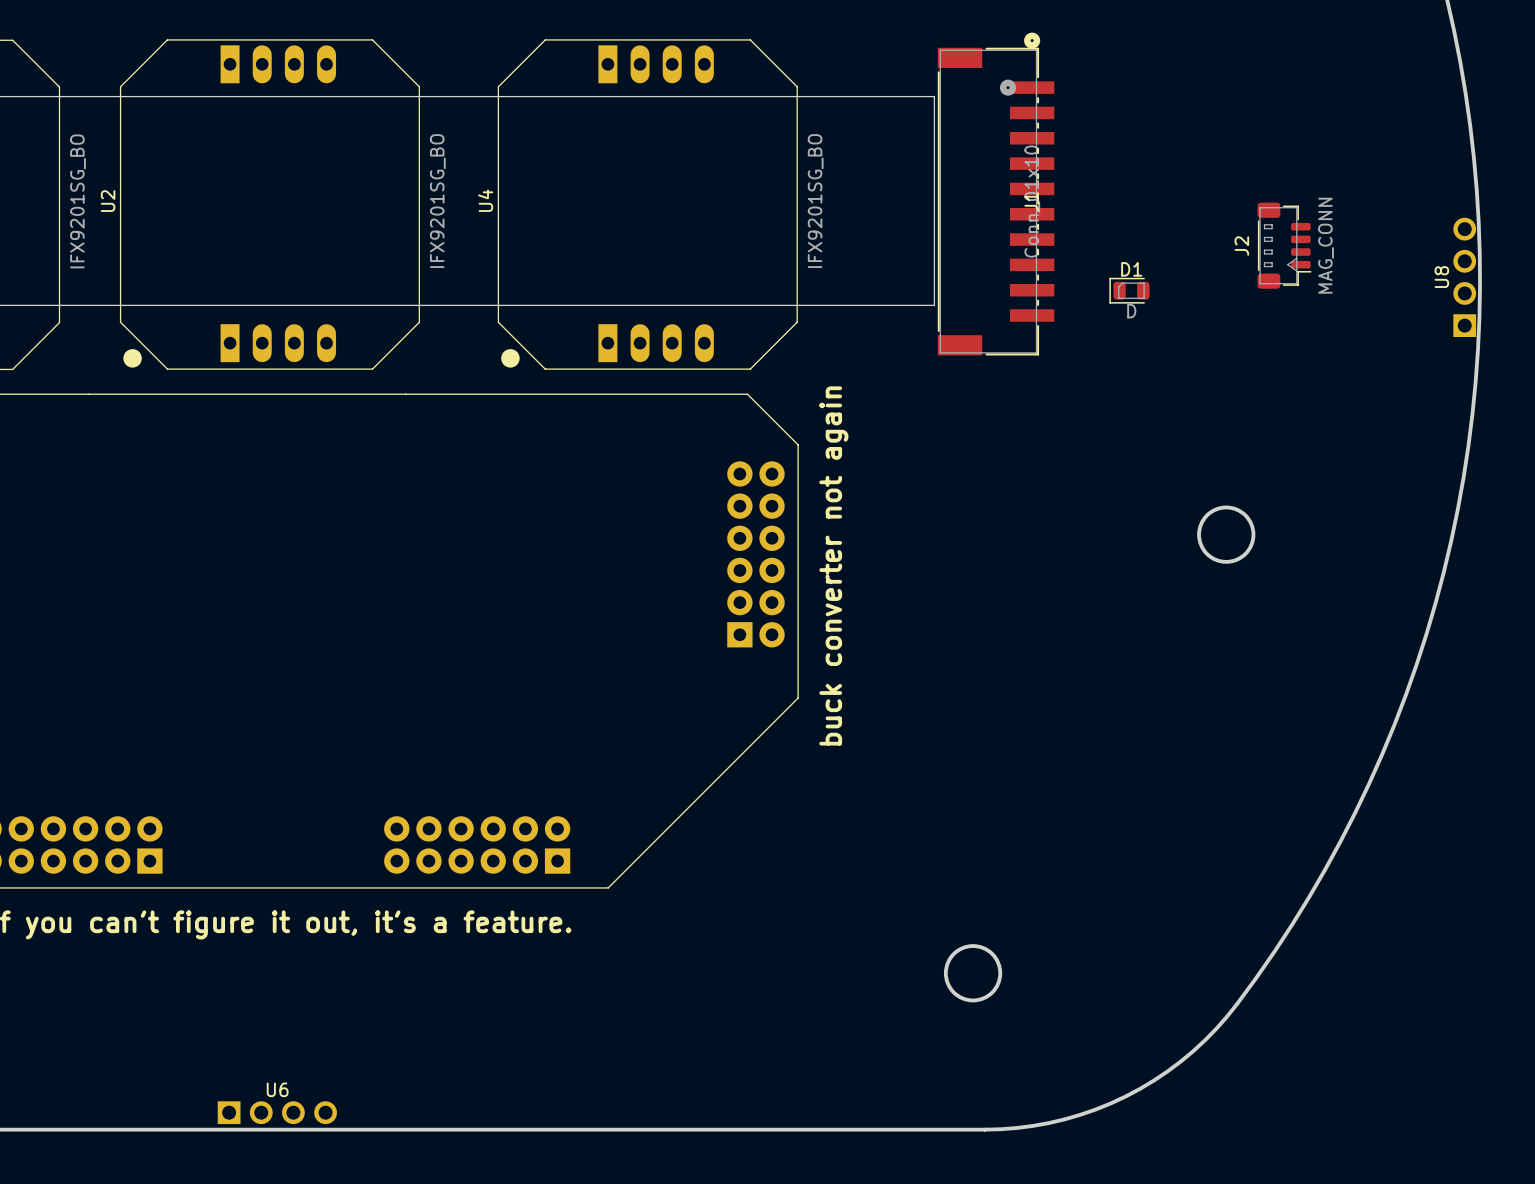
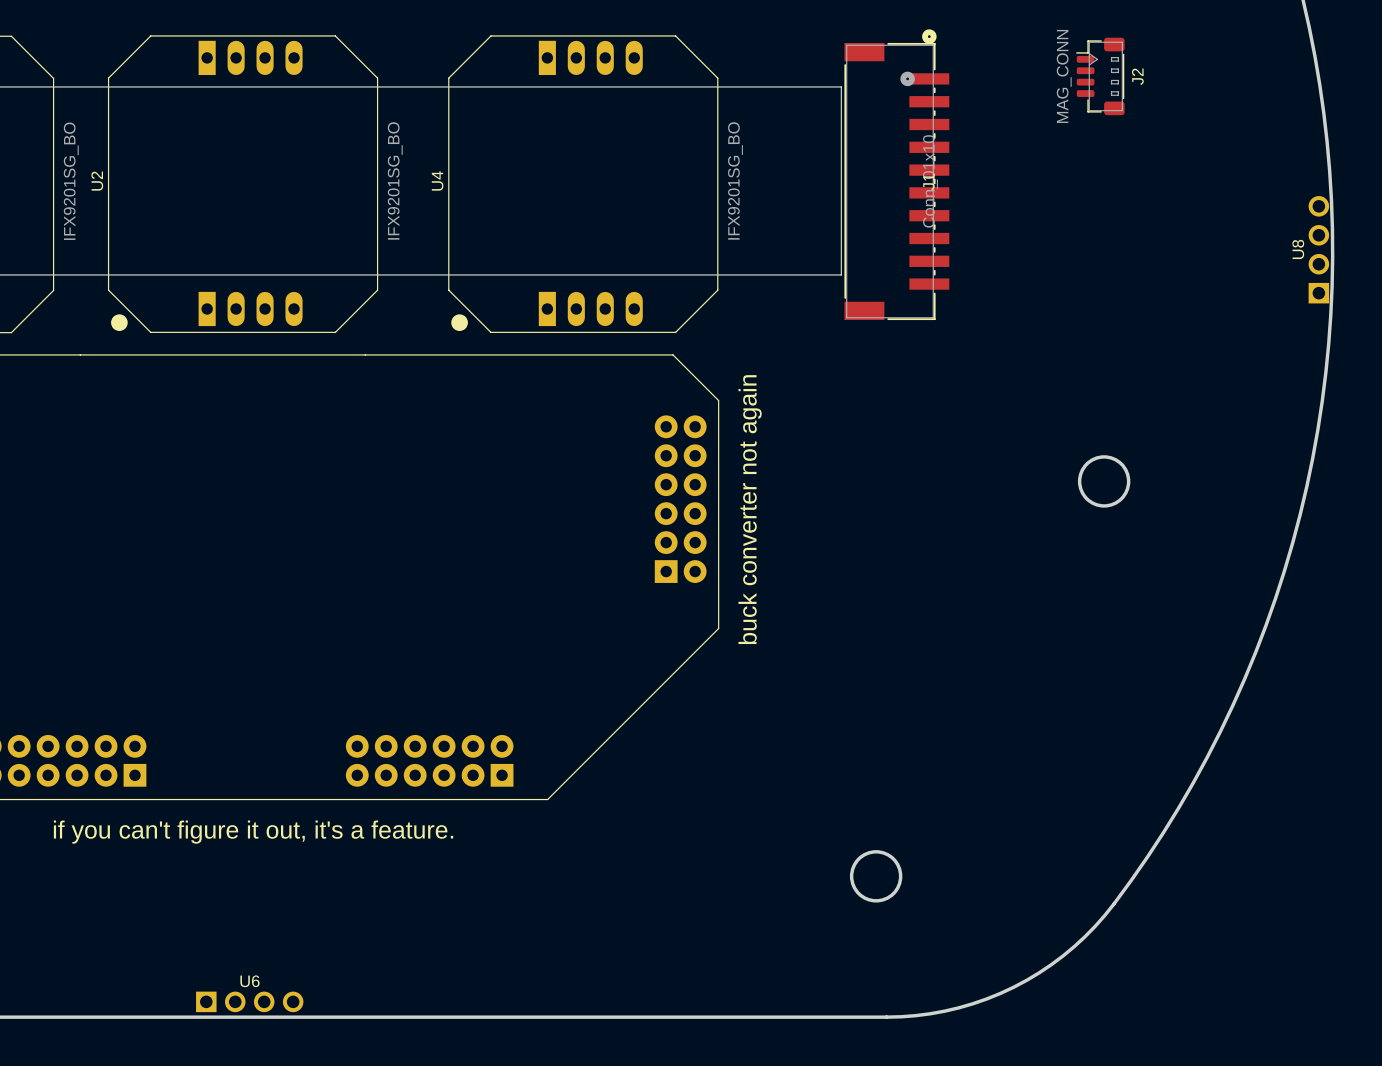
J2 rotation: 0° (1284, 245) -> 180° (1100, 76)
J2 position: (1284, 245) -> (1100, 76)
D1: D (1129, 290) -> none

